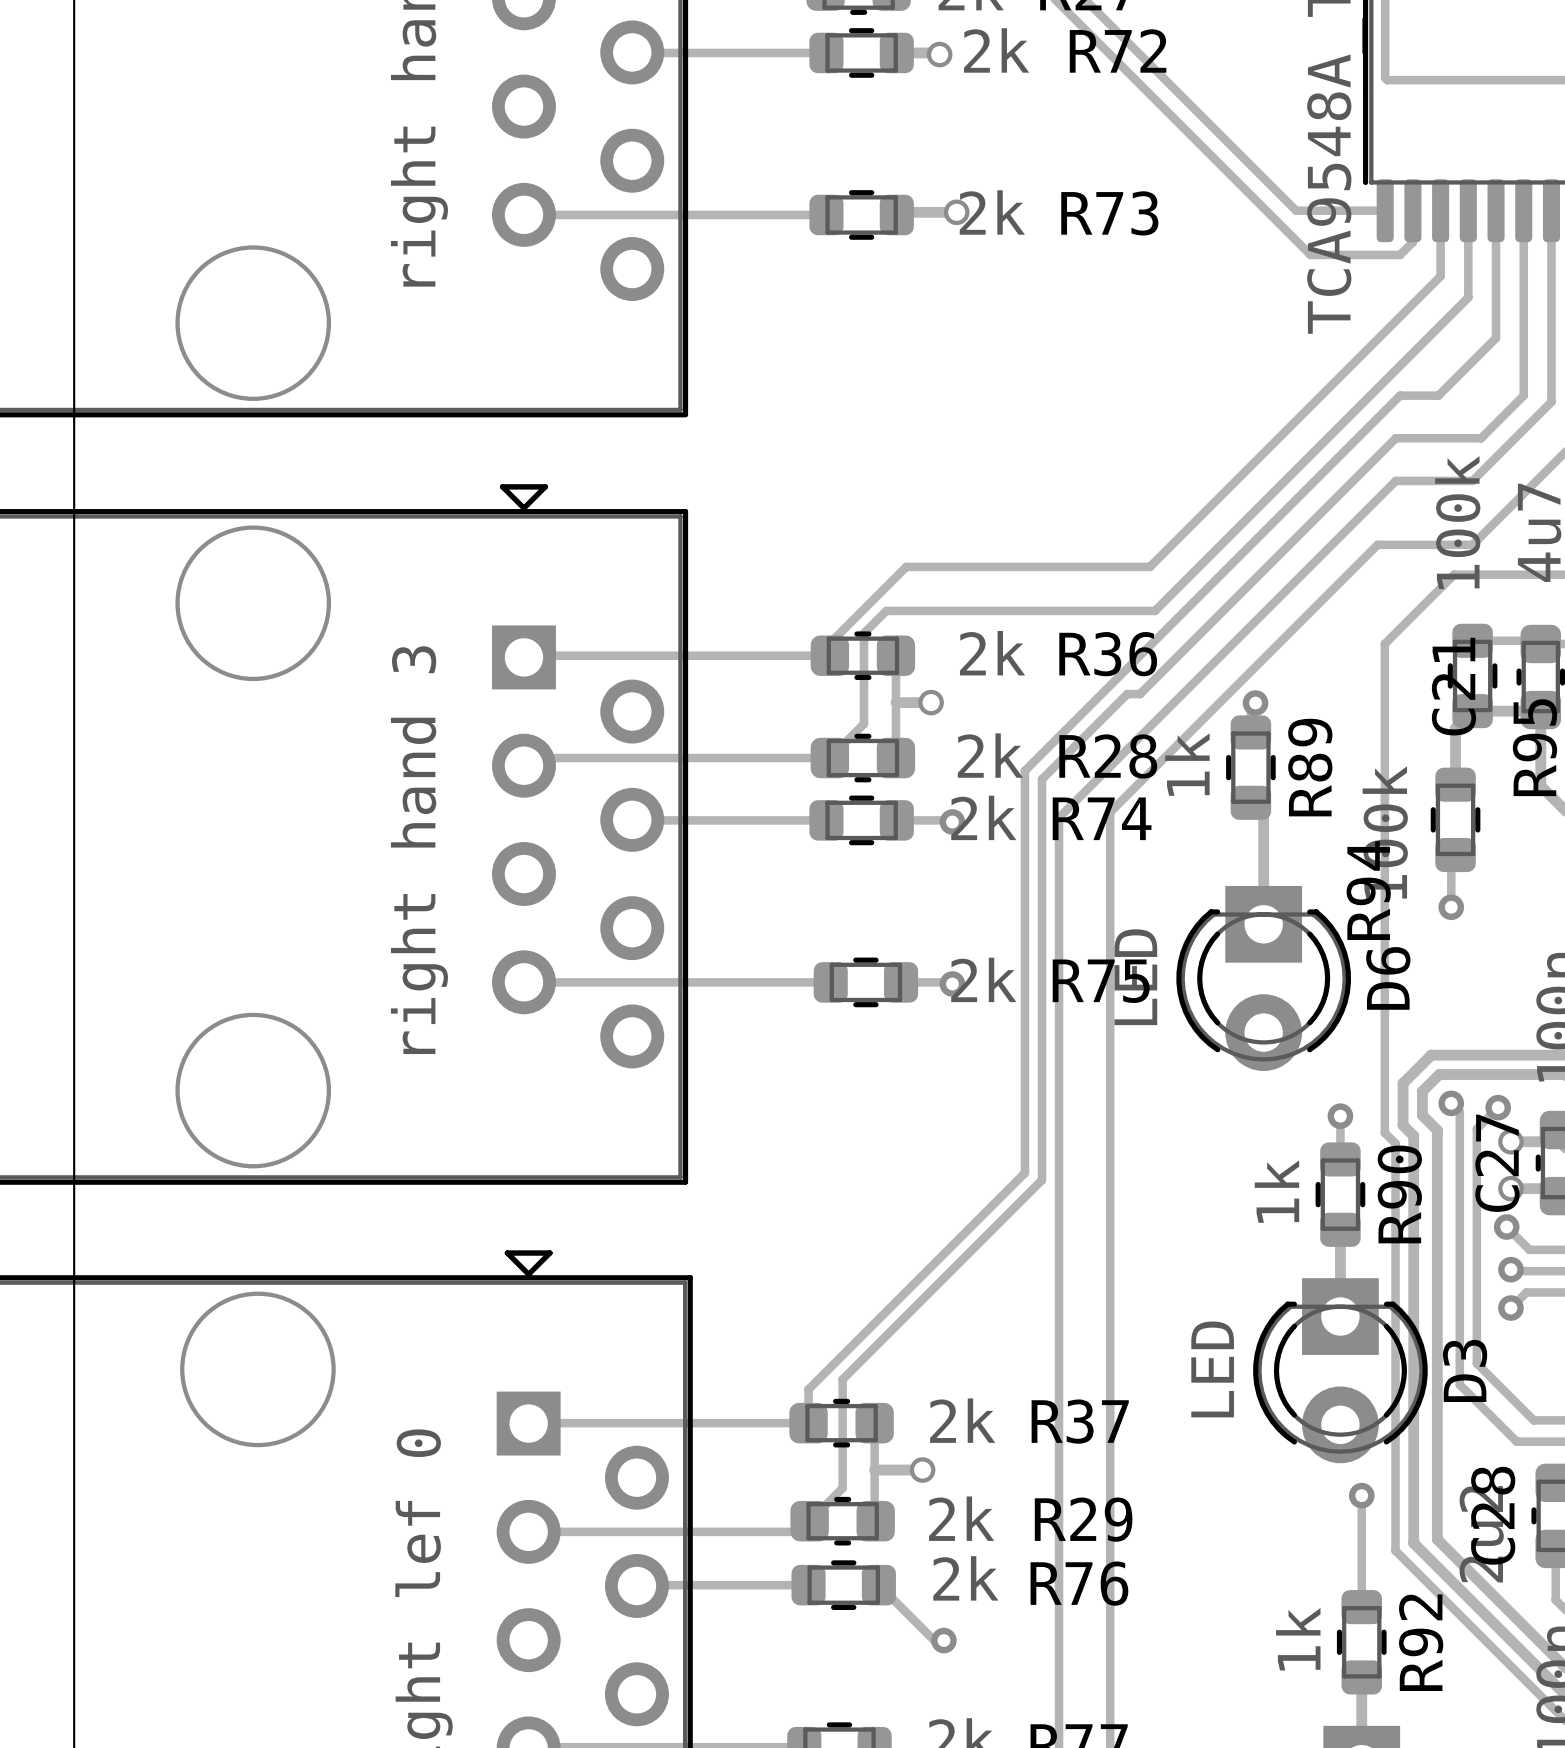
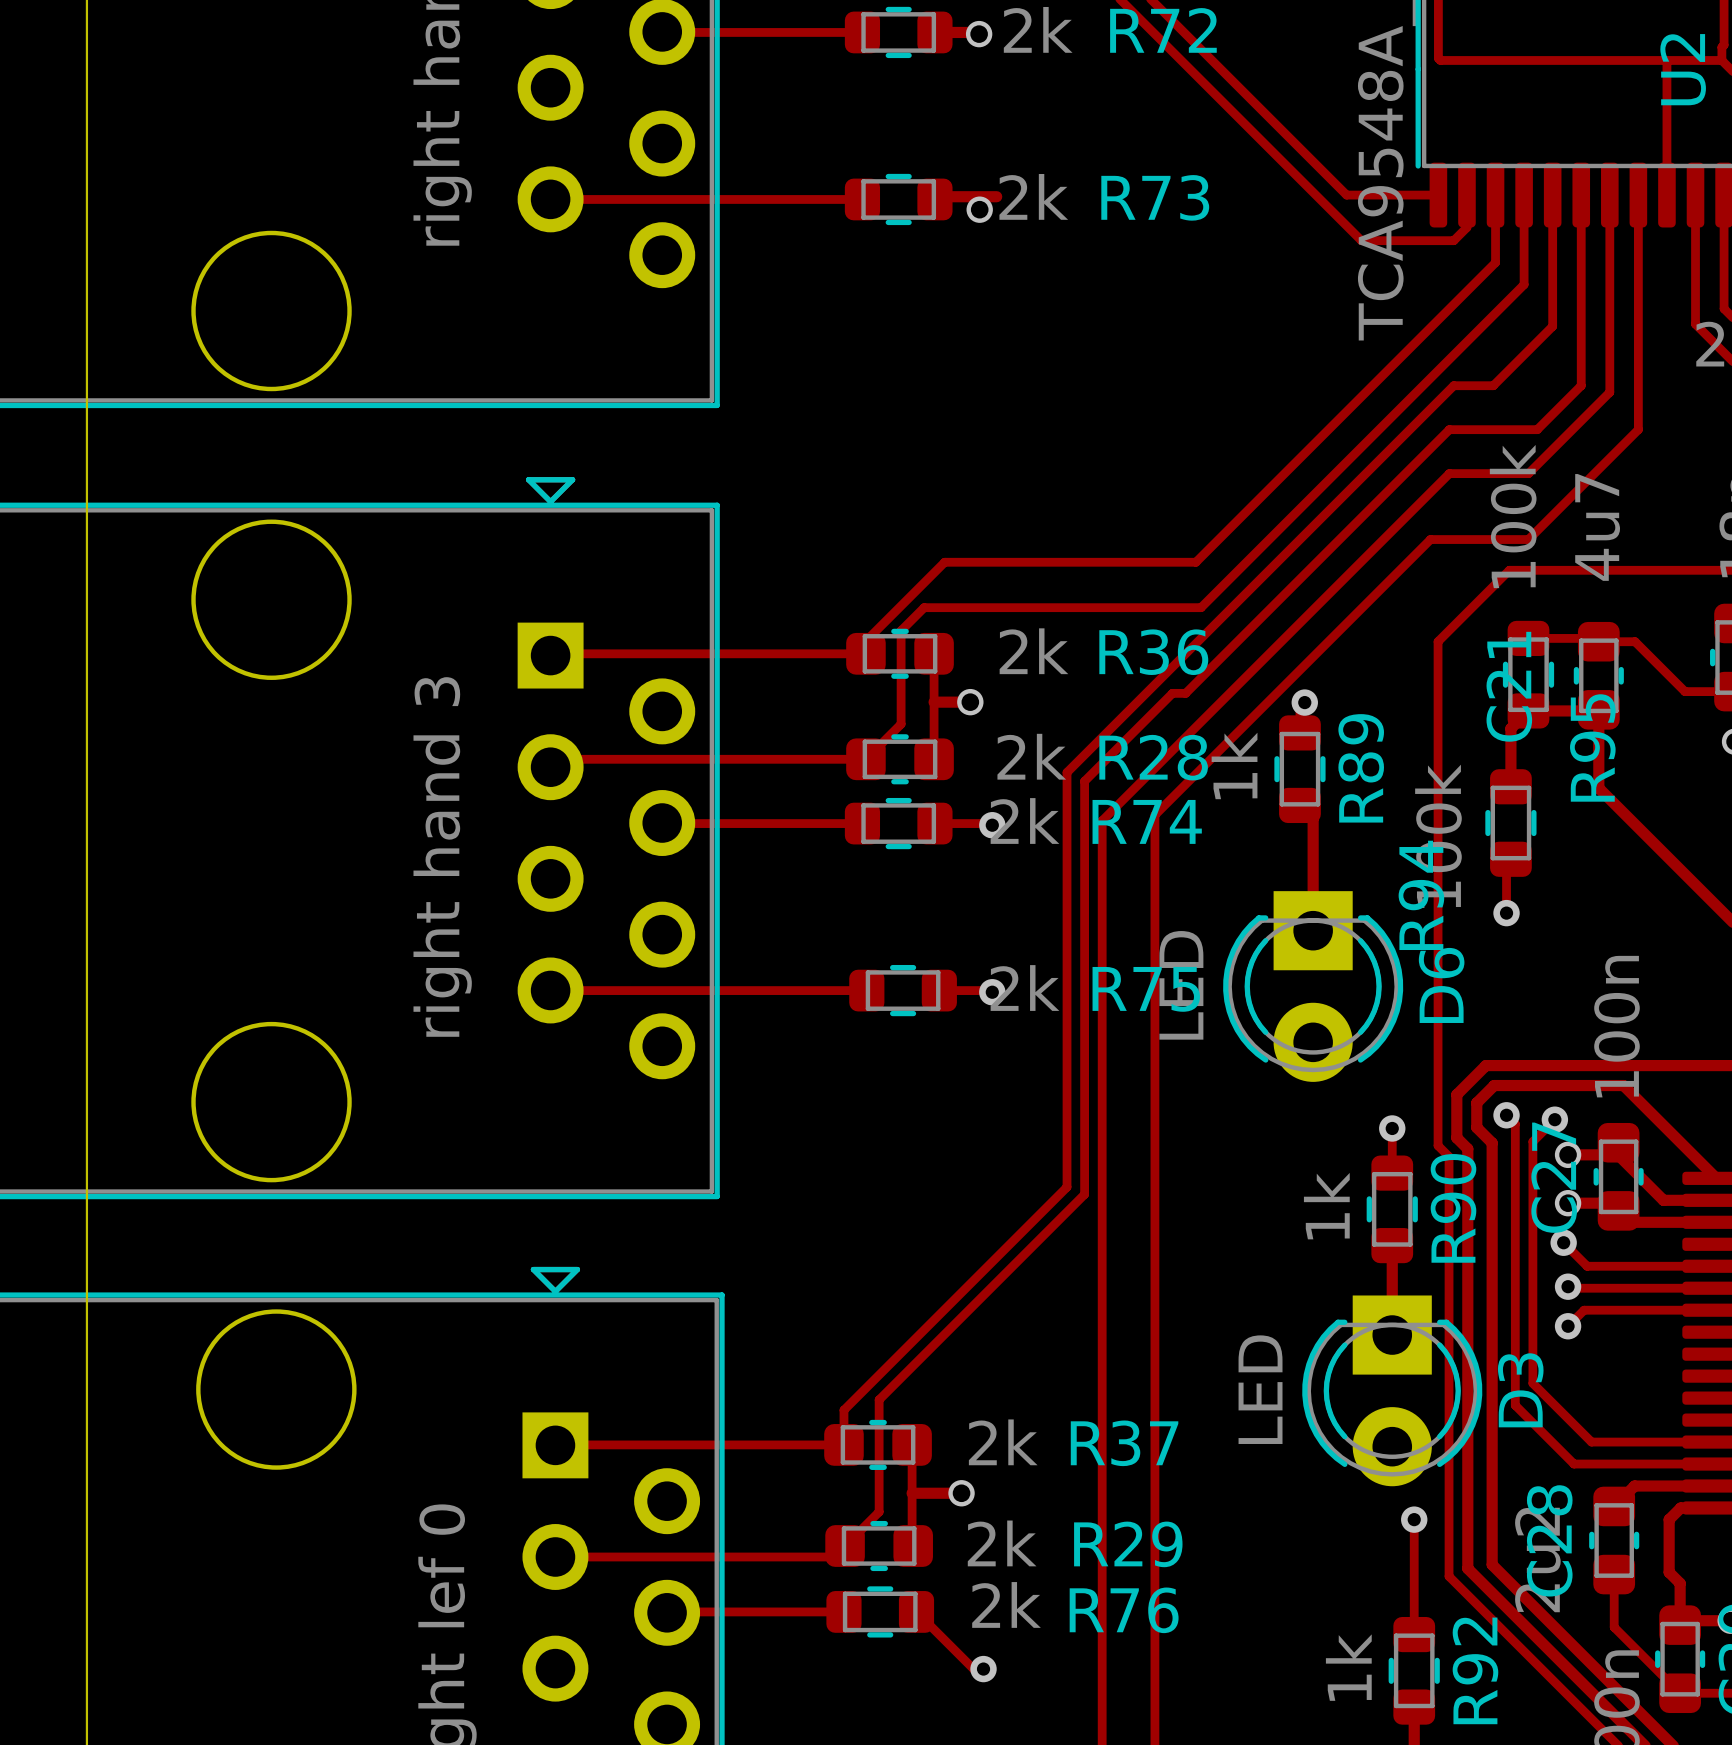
via position: (956, 212) -> (979, 209)

